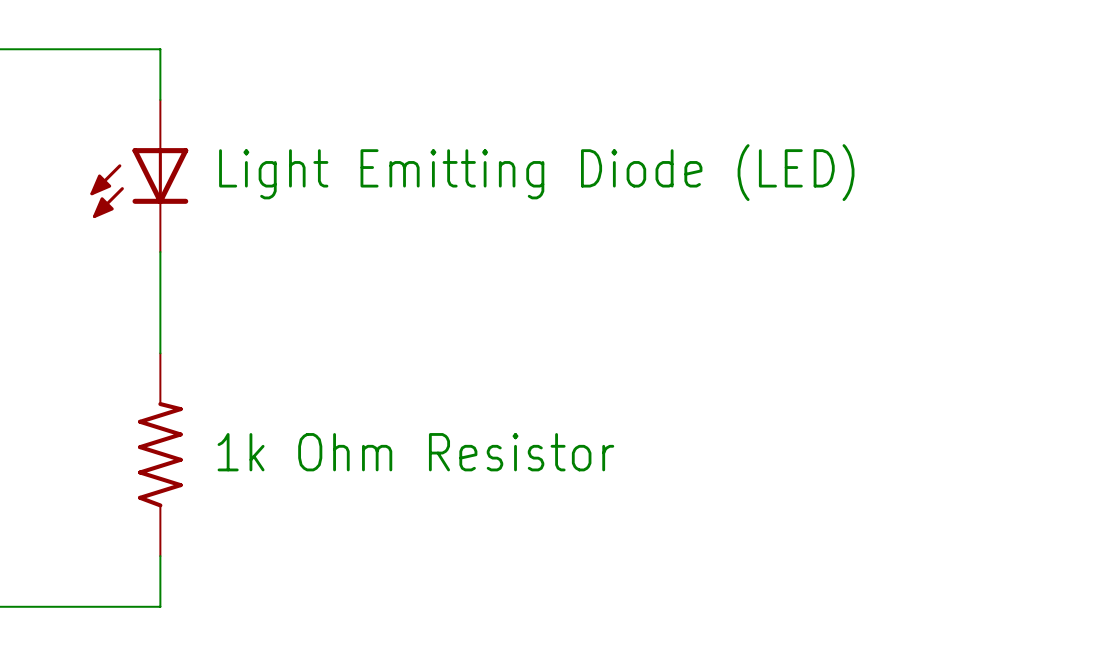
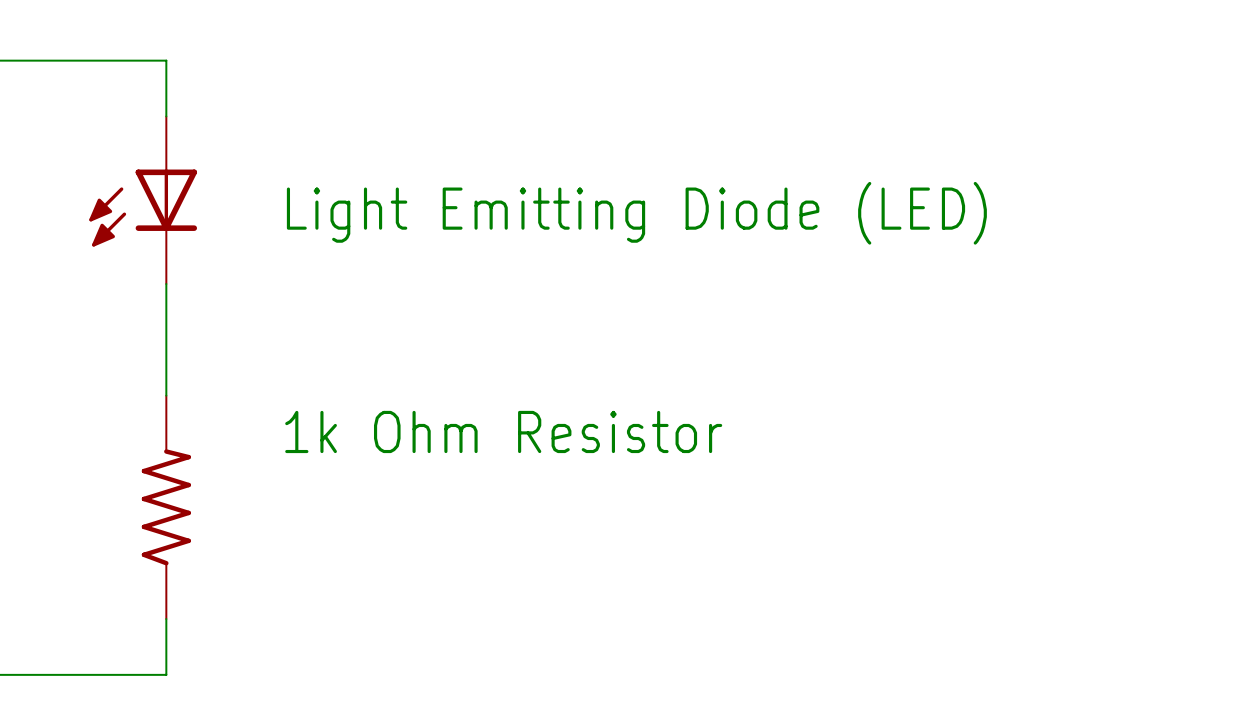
text position: Light Emitting Diode (LED) (536, 172) -> Light Emitting Diode (LED) (636, 213)
text position: 1k Ohm Resistor (415, 452) -> 1k Ohm Resistor (503, 431)

